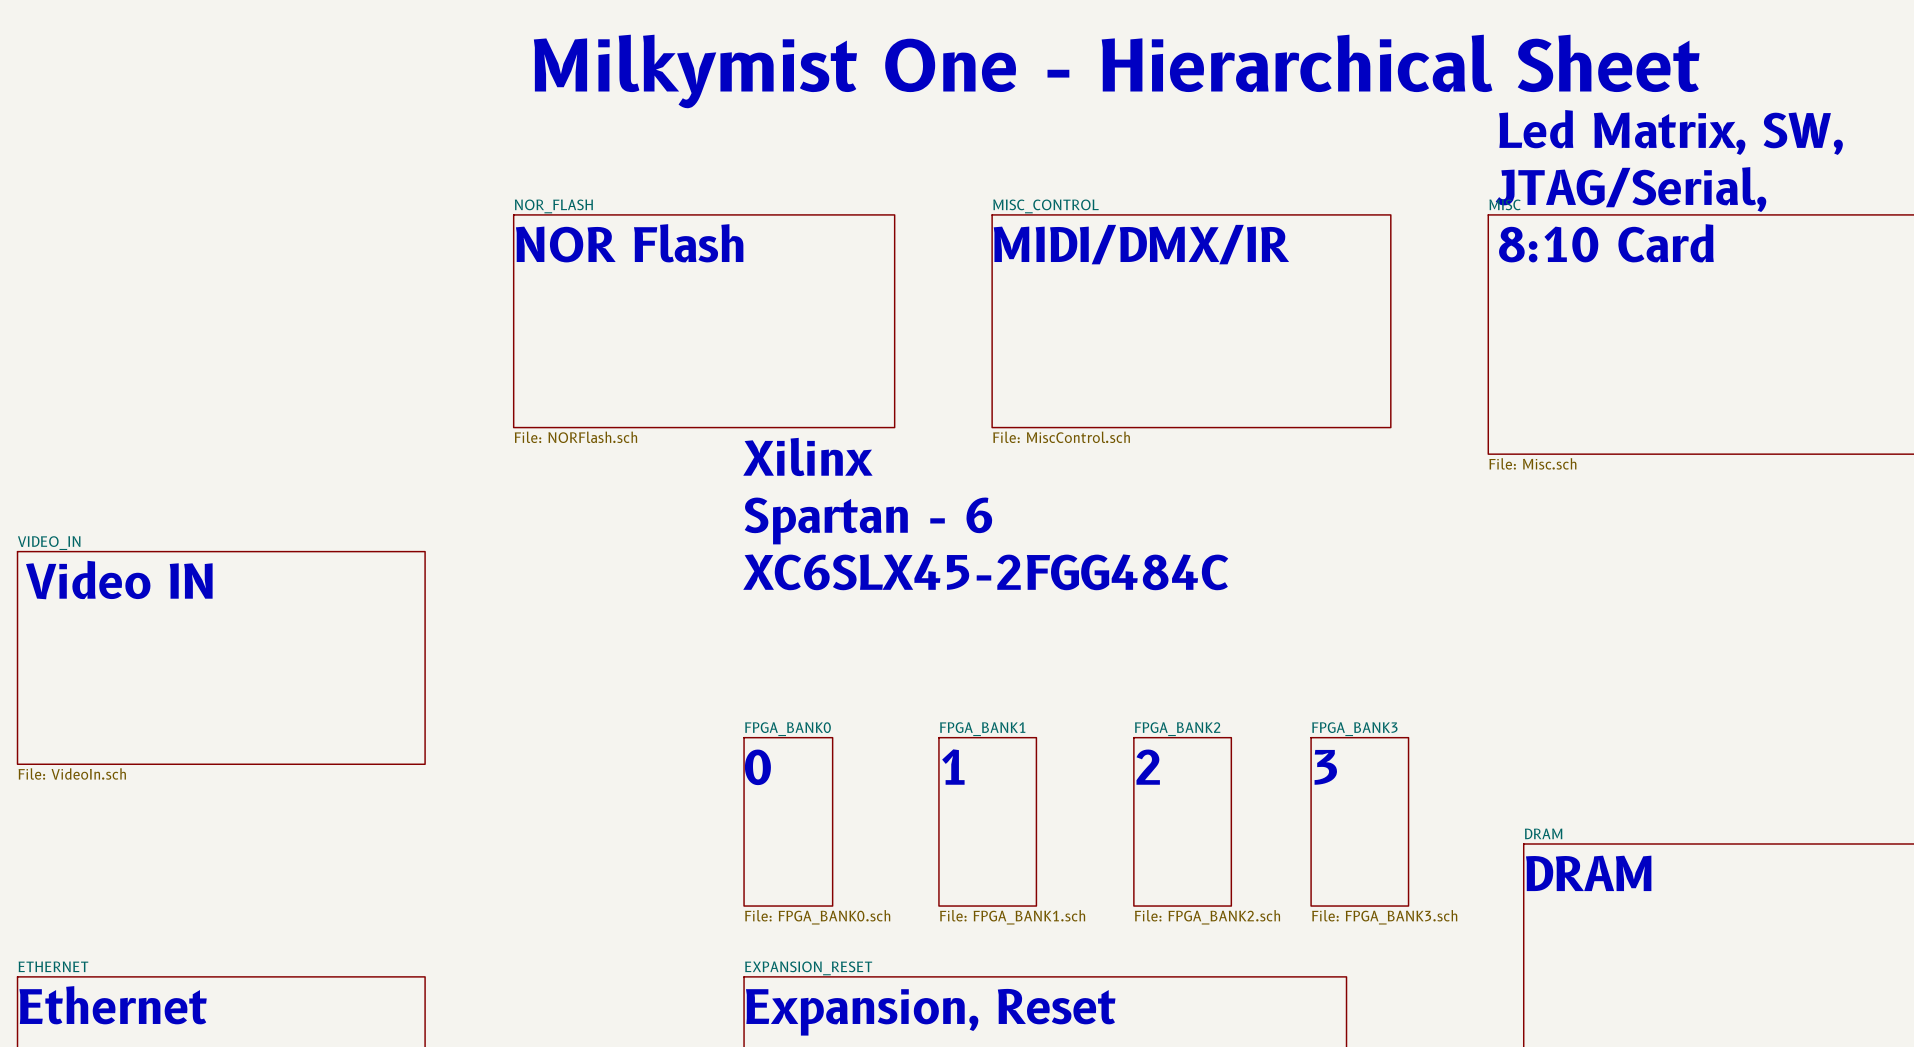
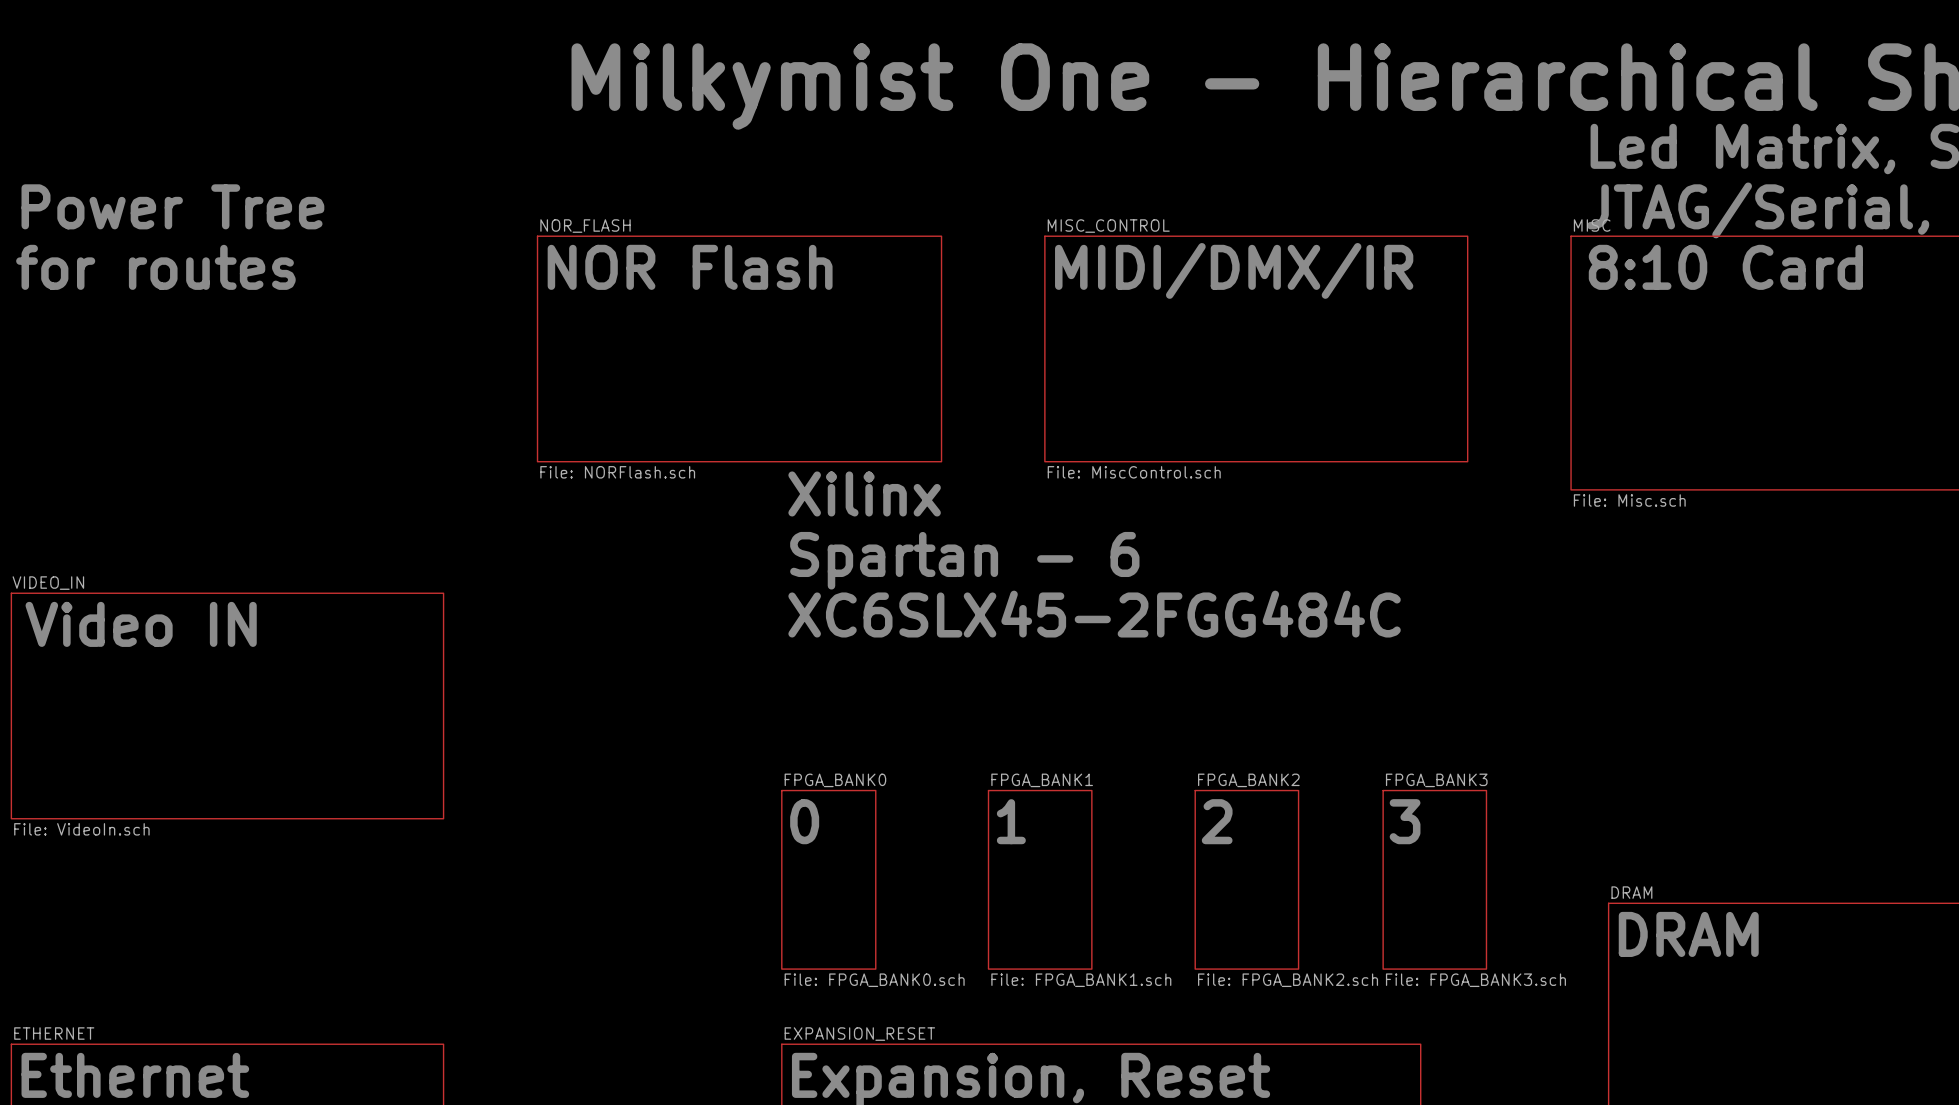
text: none -> Power Tree (172, 206)
text: none -> for routes (155, 267)

